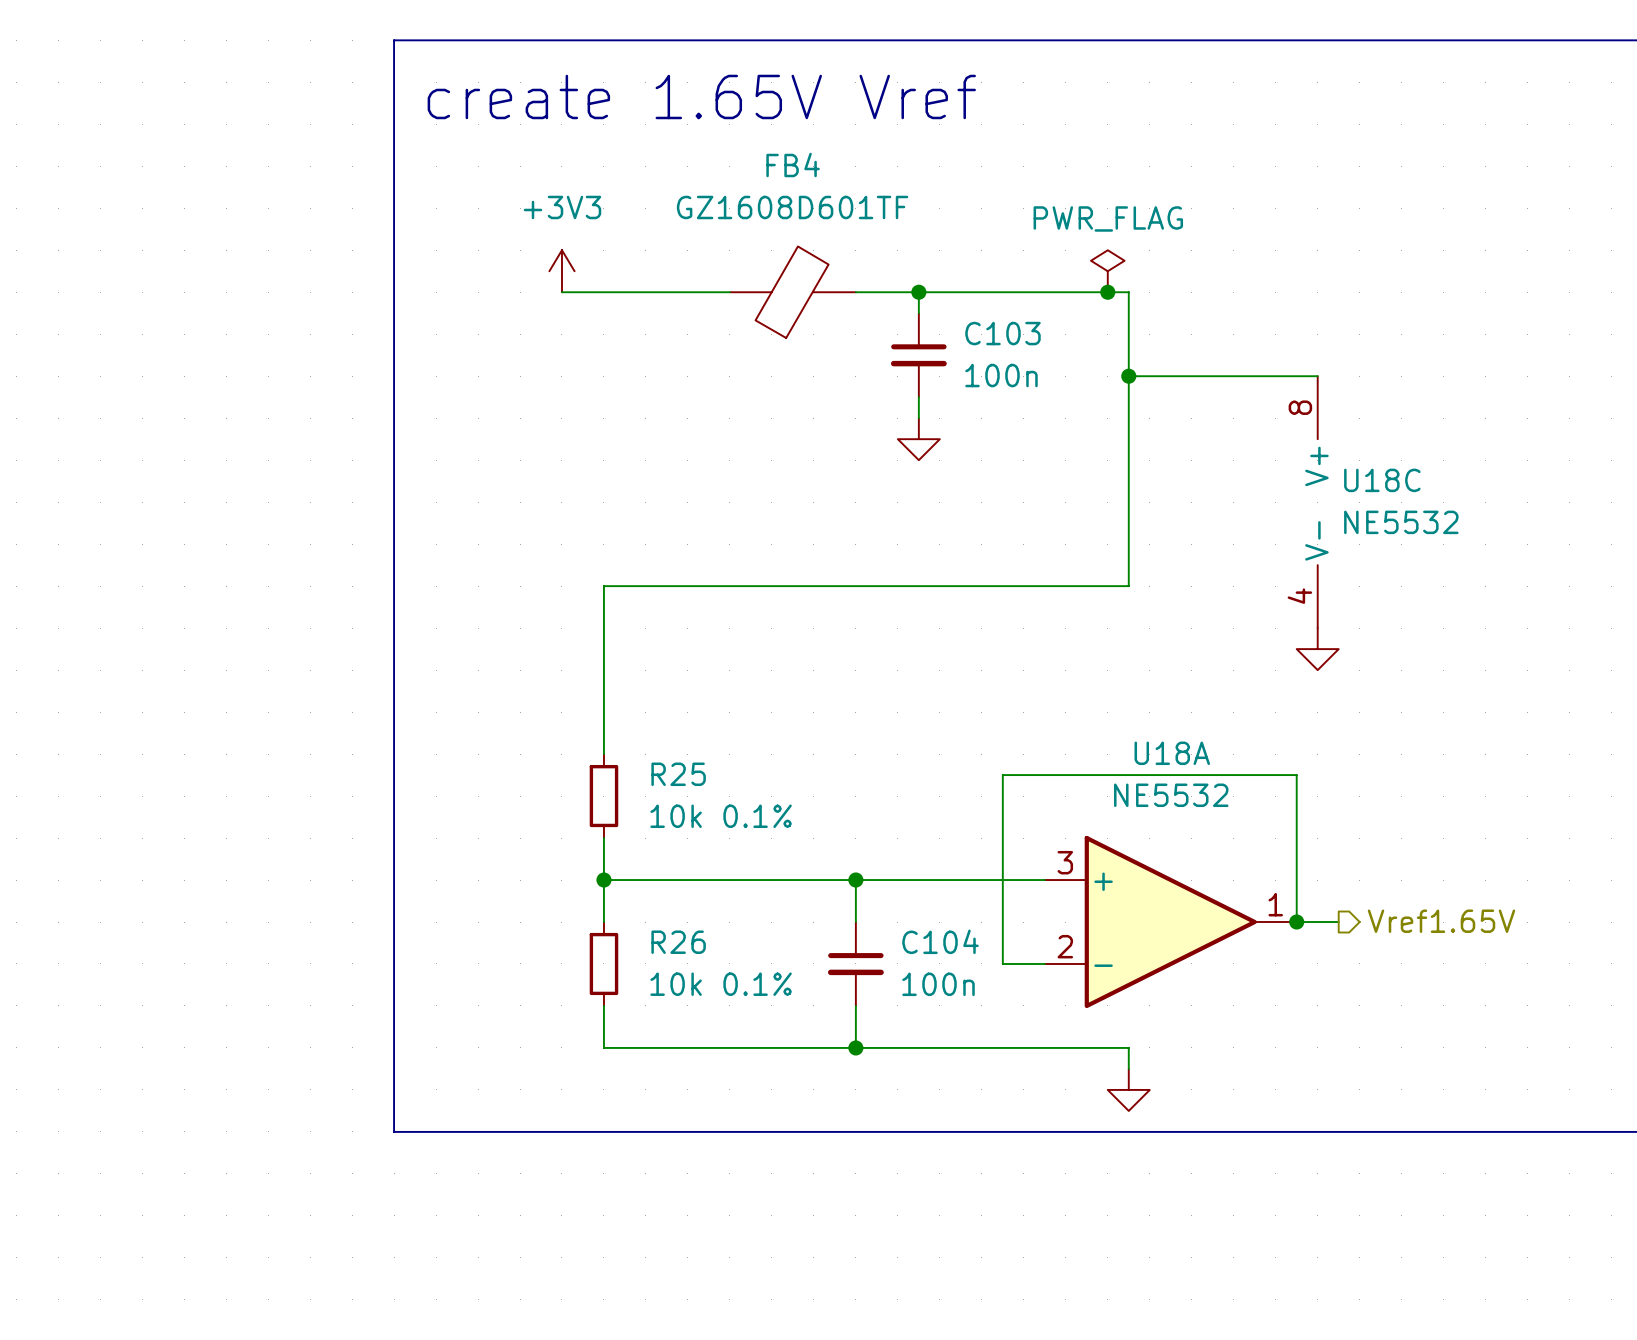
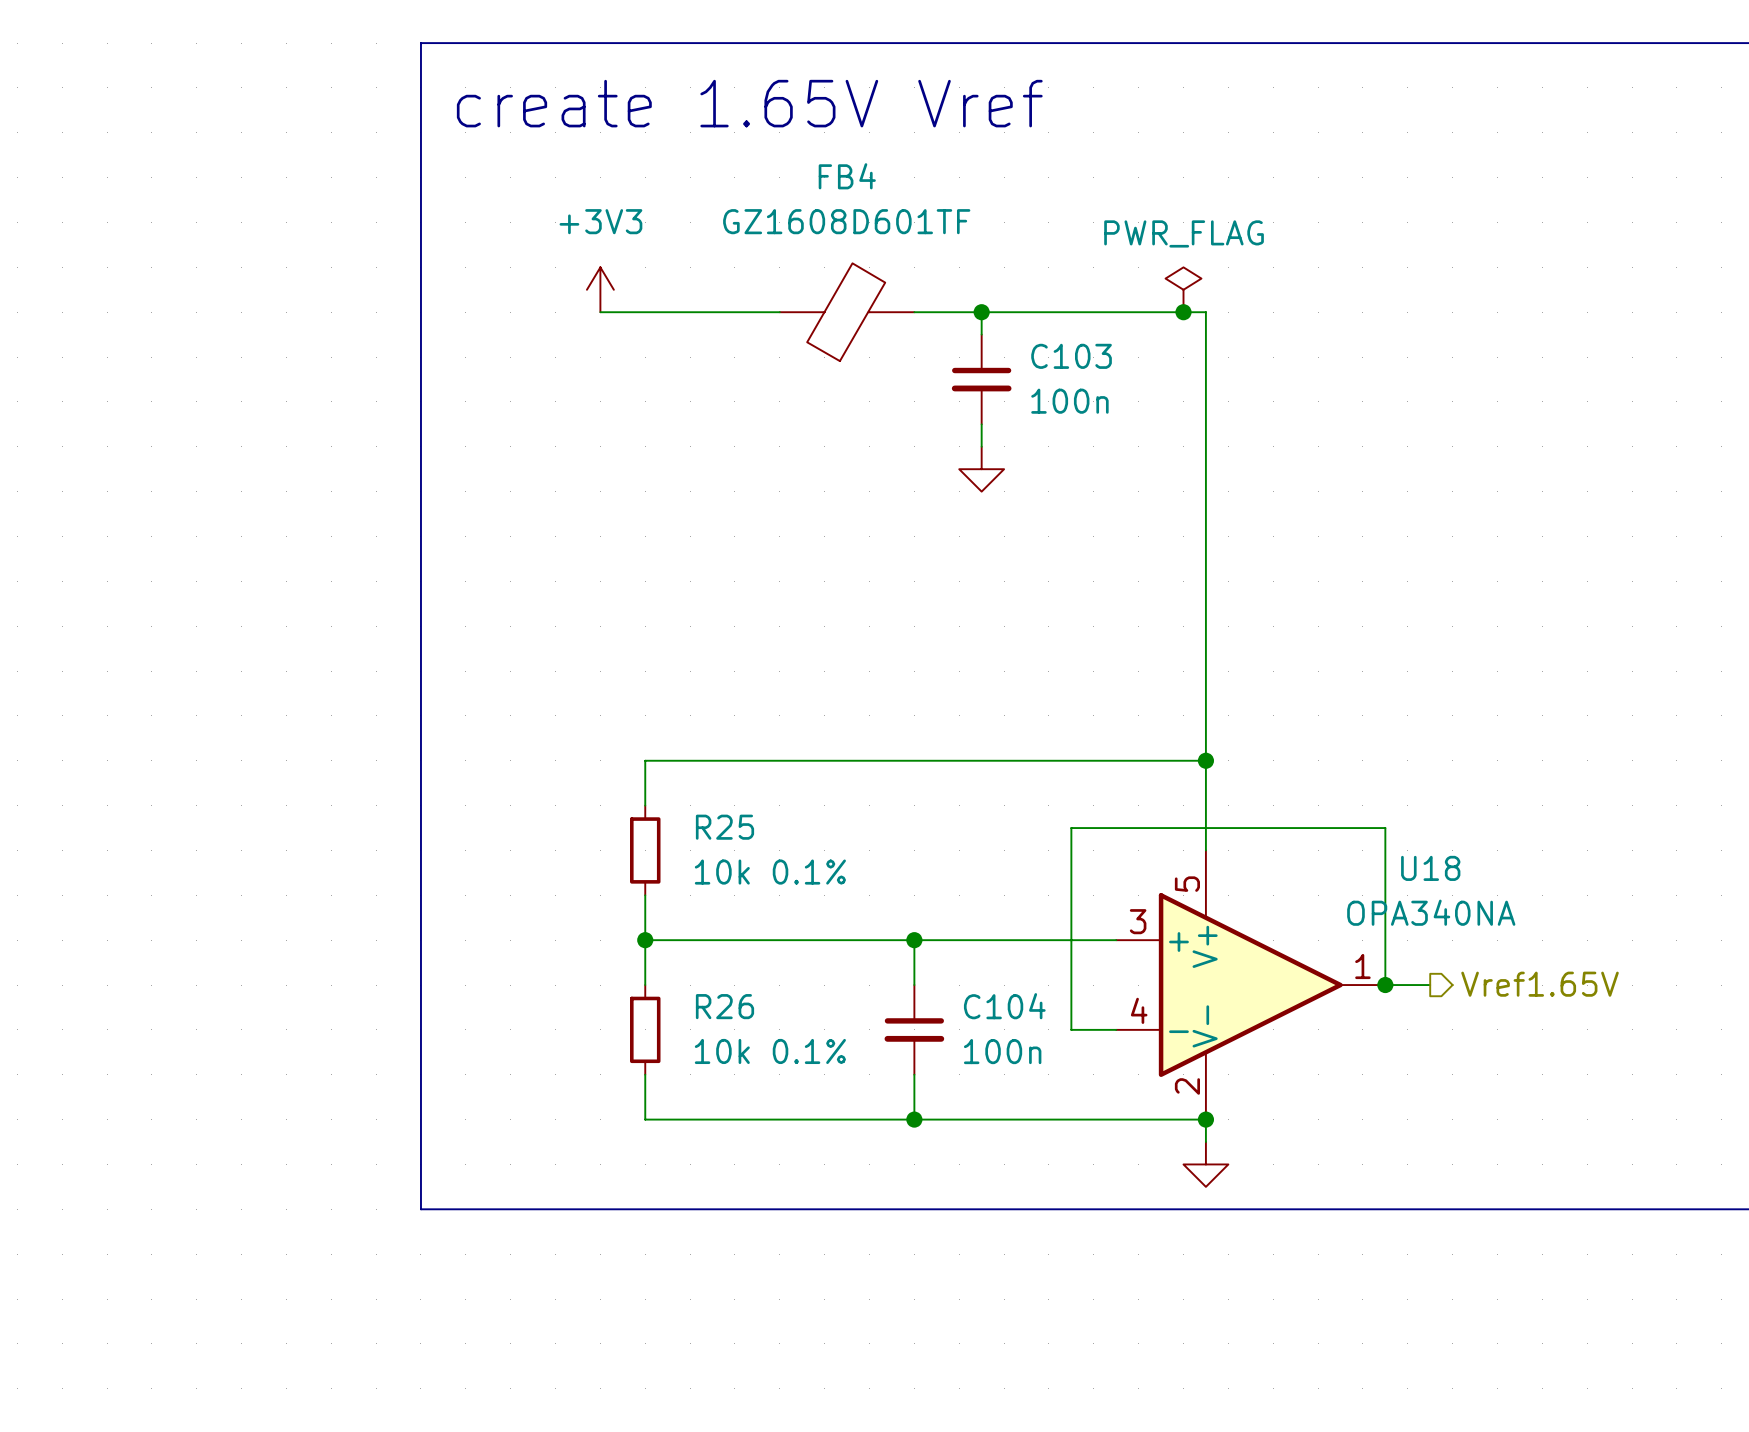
wire: (1128, 376) (1317, 376) -> none
junction: (1128, 376) -> none
U18C: NE5532 (1317, 502) -> none
wire: (1128, 586) (603, 586) (603, 712) -> (1205, 760) (645, 760)
wire: none -> (1205, 626) (1205, 850)
power symbol: (1317, 649) -> none
junction: none -> (1205, 760)
U18A: NE5532 (1170, 922) -> none
U18: none -> OPA340NA (1250, 985)
junction: none -> (1205, 1119)

